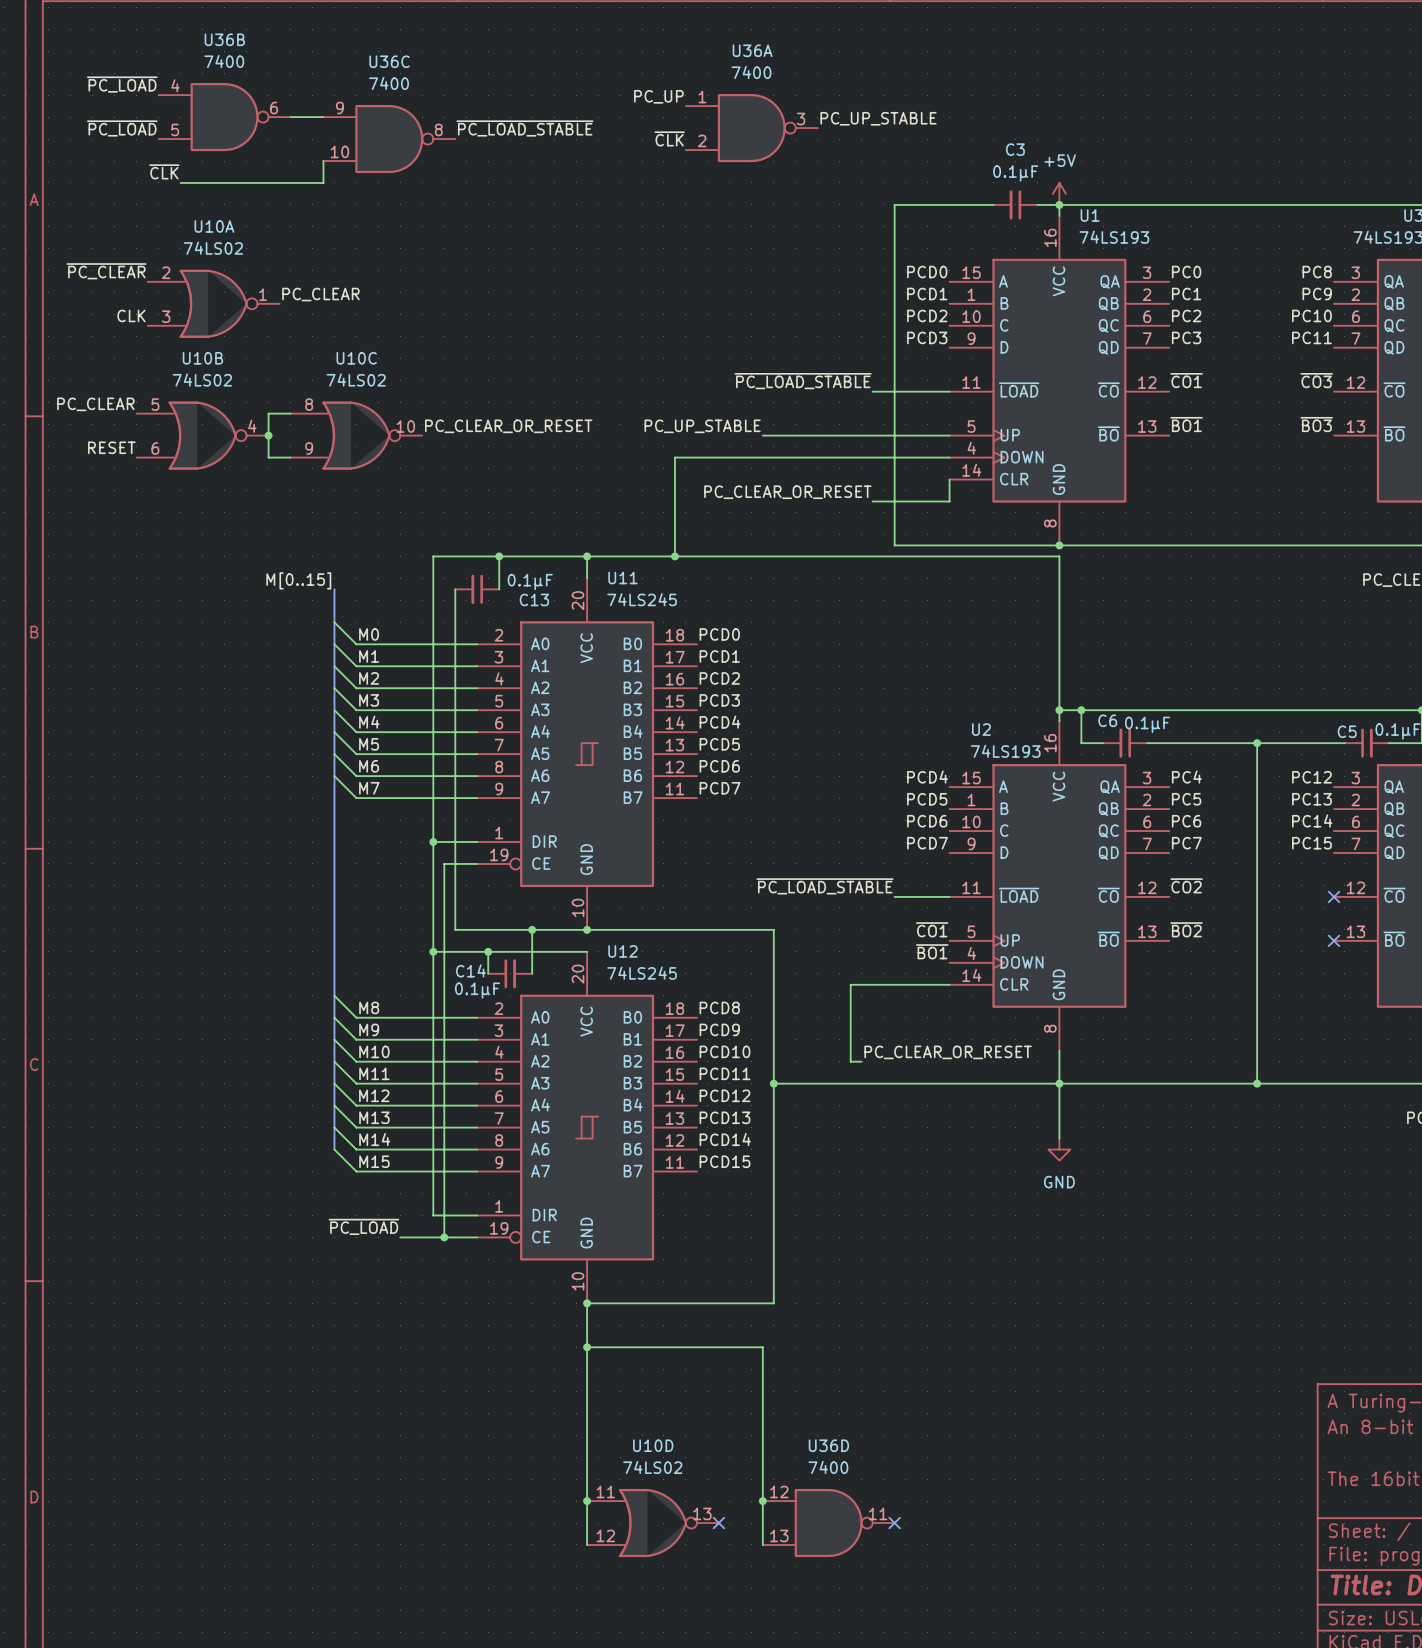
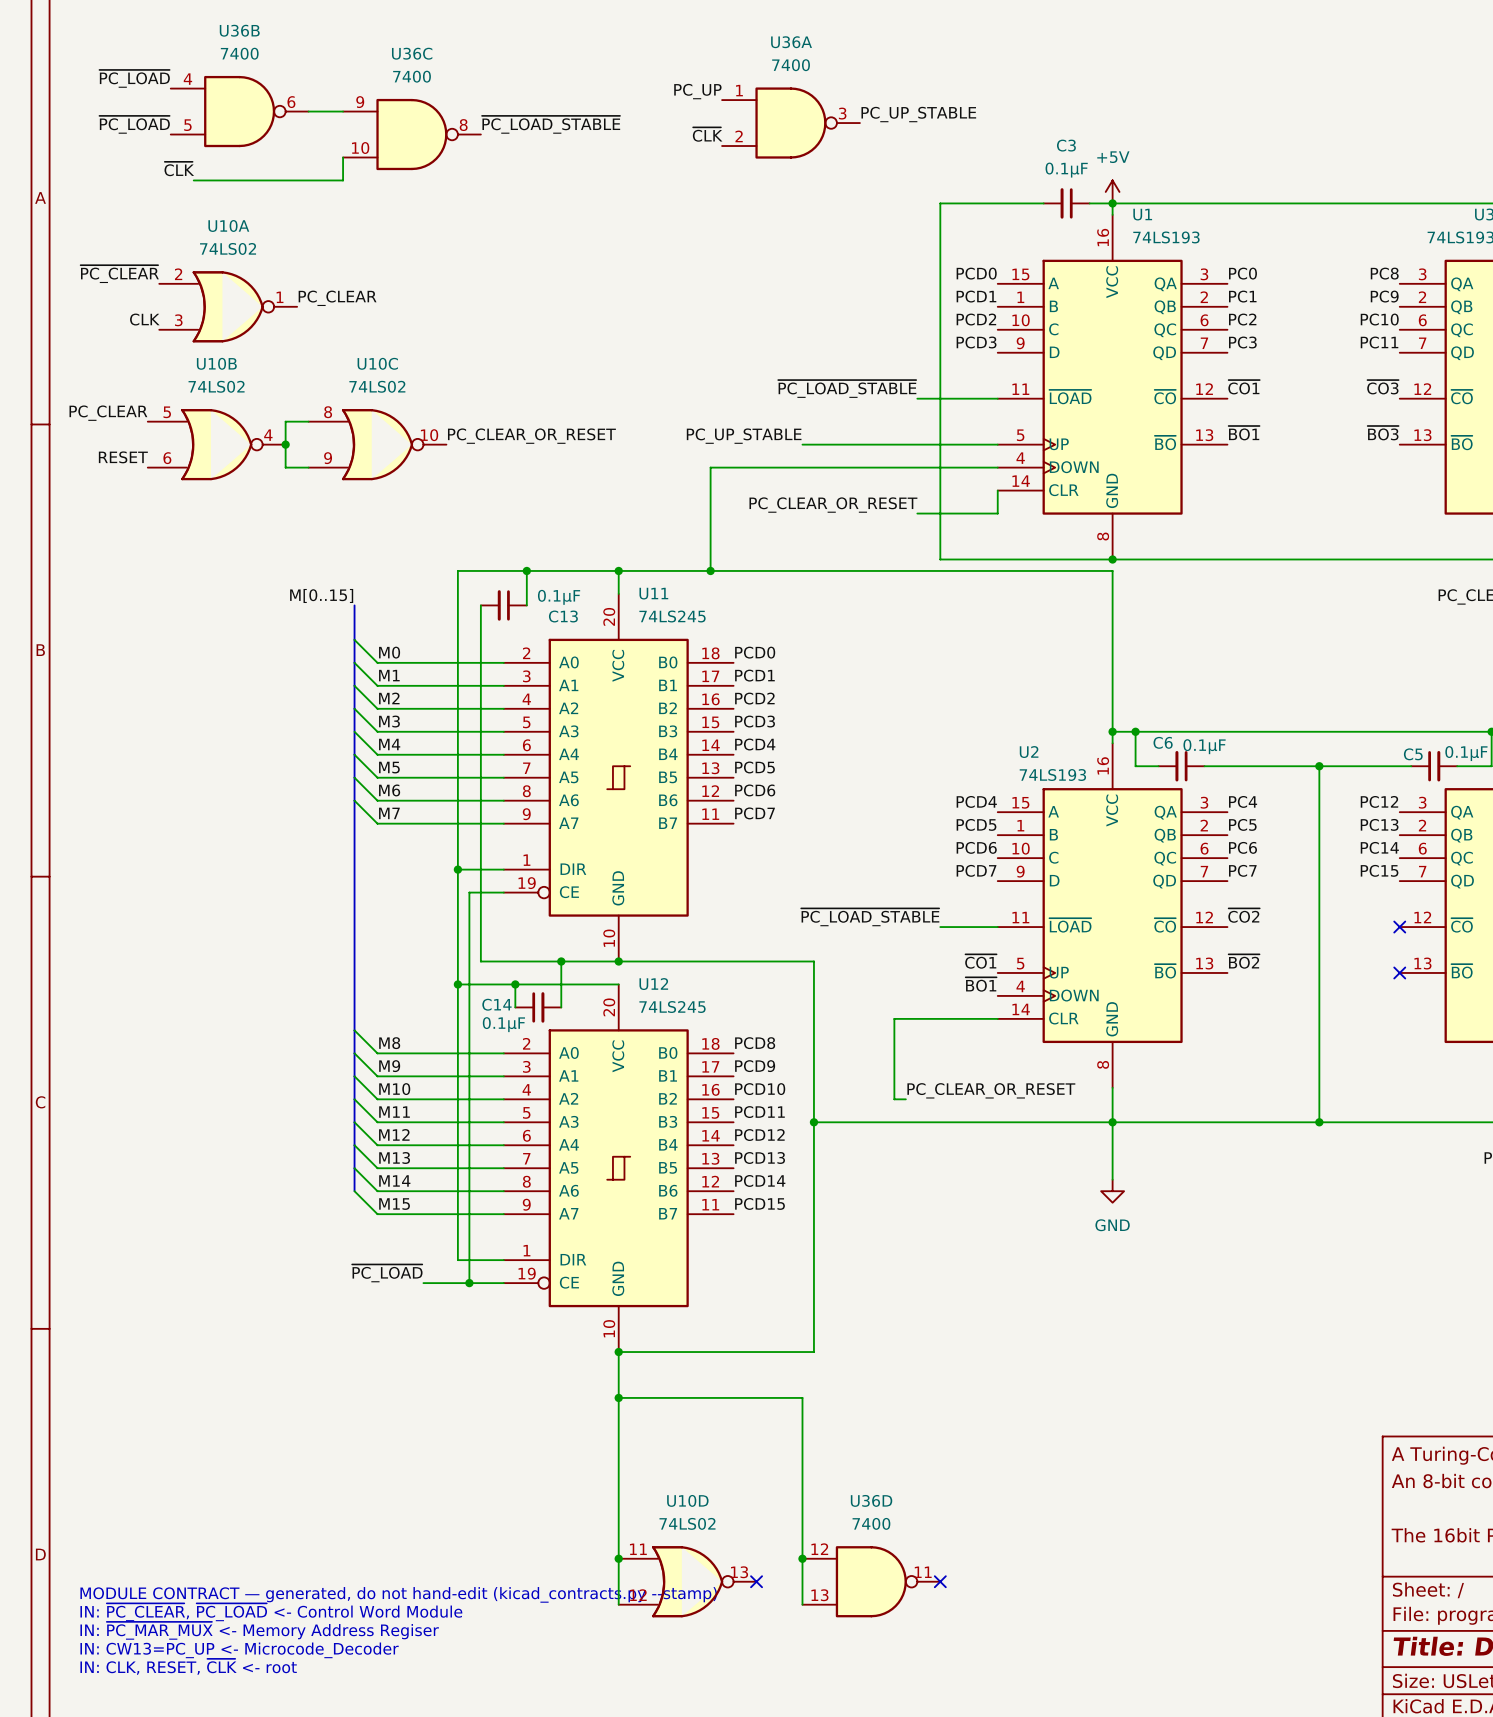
text: none -> MODULE CONTRACT — generated, do not hand-edit (kicad_contracts.py --stamp) (398, 1594)
text: none -> IN: ~{PC_CLEAR}, ~{PC_LOAD} <- Control Word Module (271, 1612)
text: none -> IN: ~{PC_MAR_MUX} <- Memory Address Regiser (259, 1630)
text: none -> IN: CW13=PC_UP <- Microcode_Decoder (239, 1650)
text: none -> IN: CLK, RESET, ~{CLK} <- root (188, 1666)

